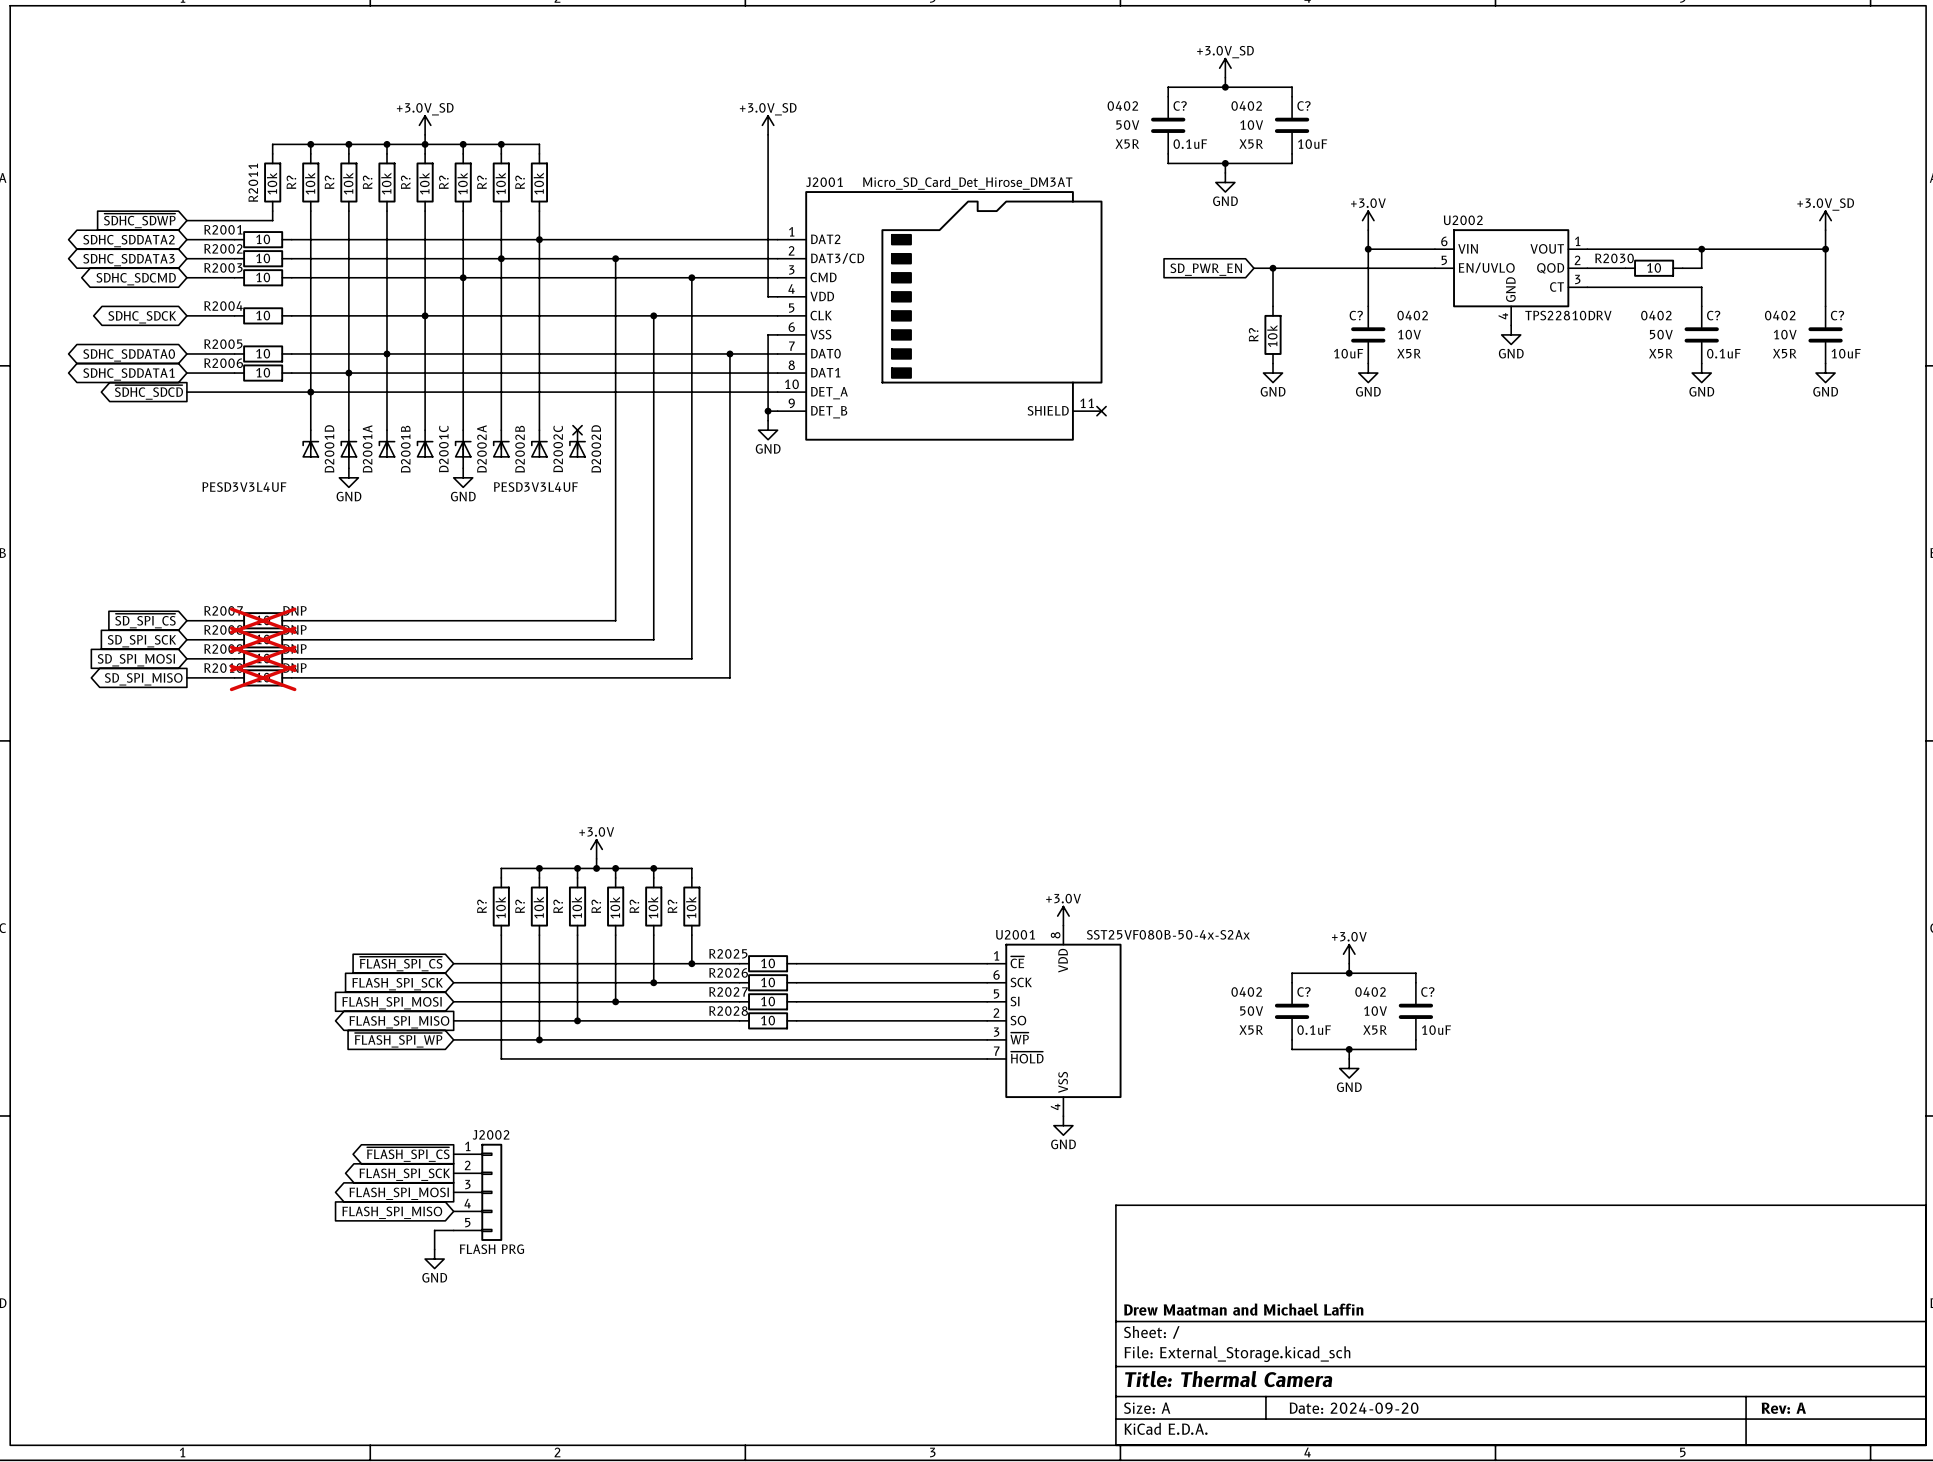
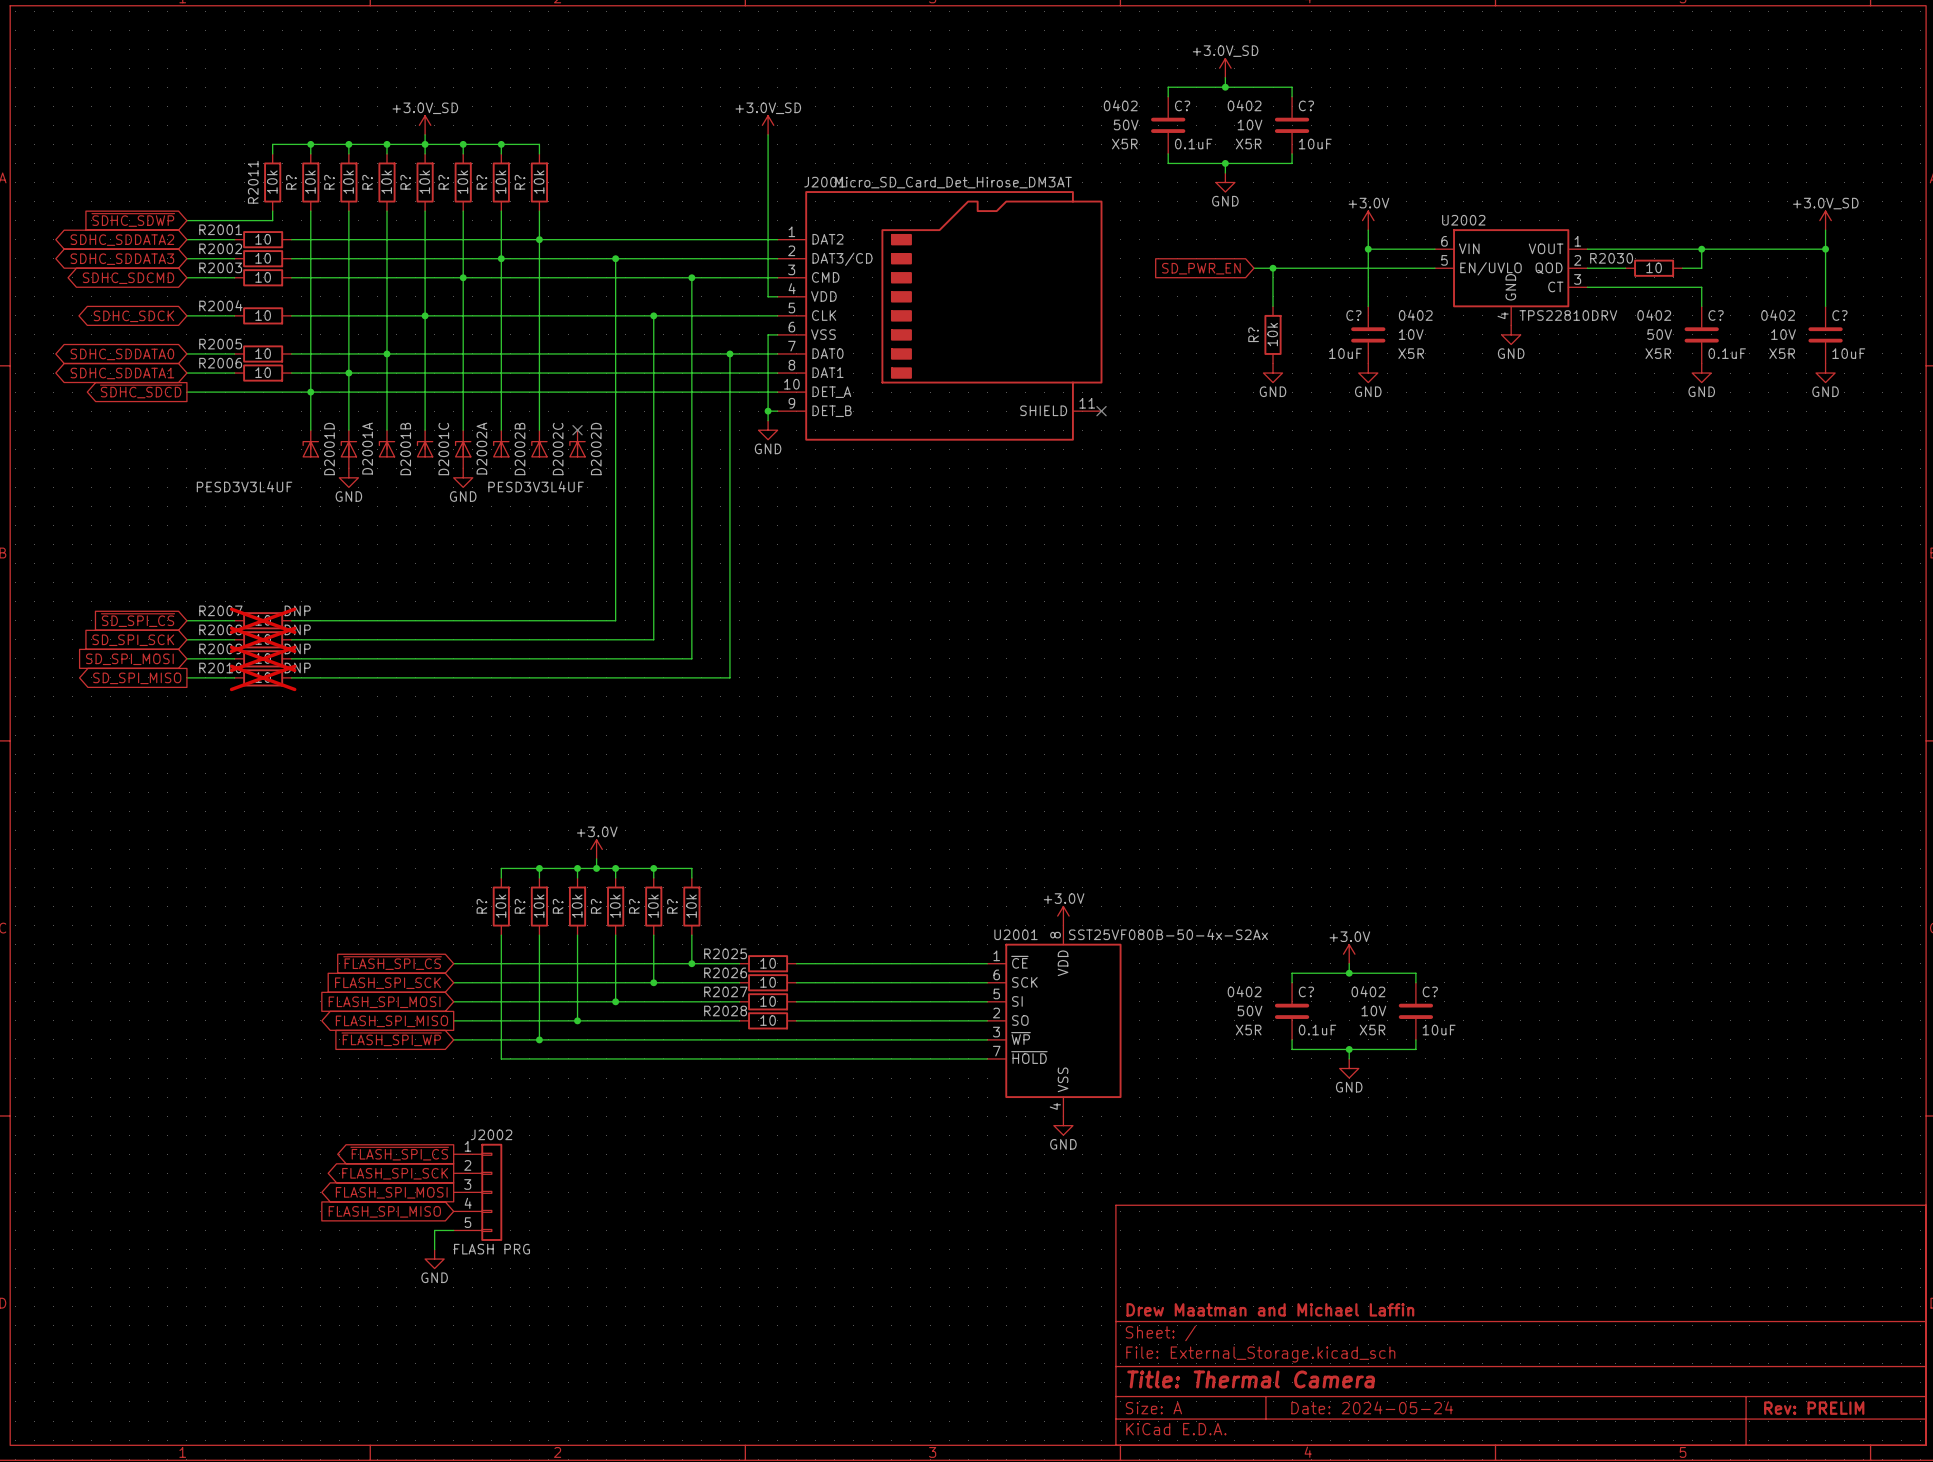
title block: Date: 2024-09-20 (1354, 1408) -> Date: 2024-05-24 (1372, 1407)
title block: Rev: A (1783, 1408) -> Rev: PRELIM (1814, 1408)

